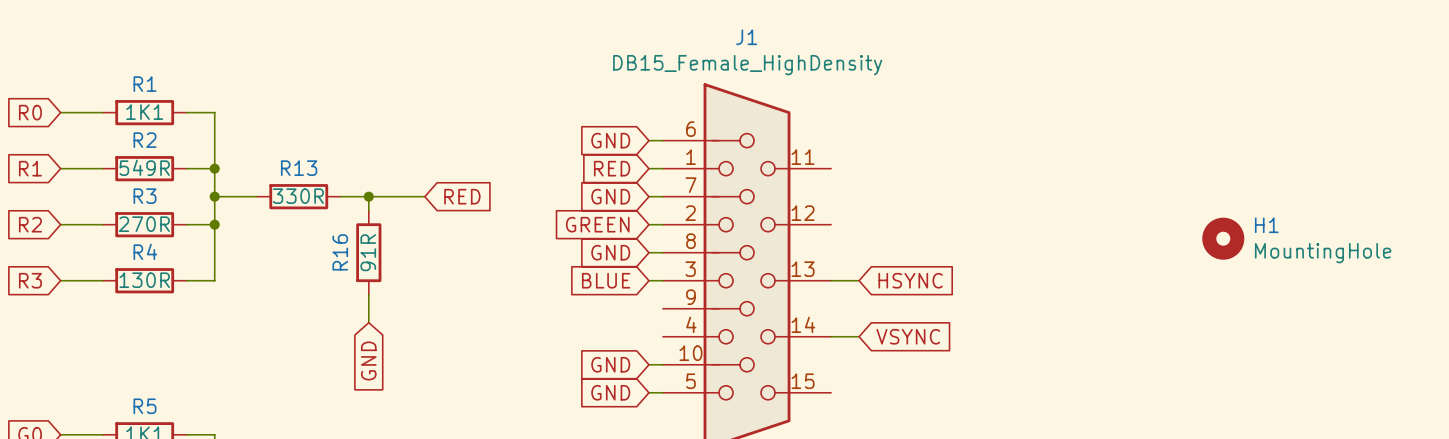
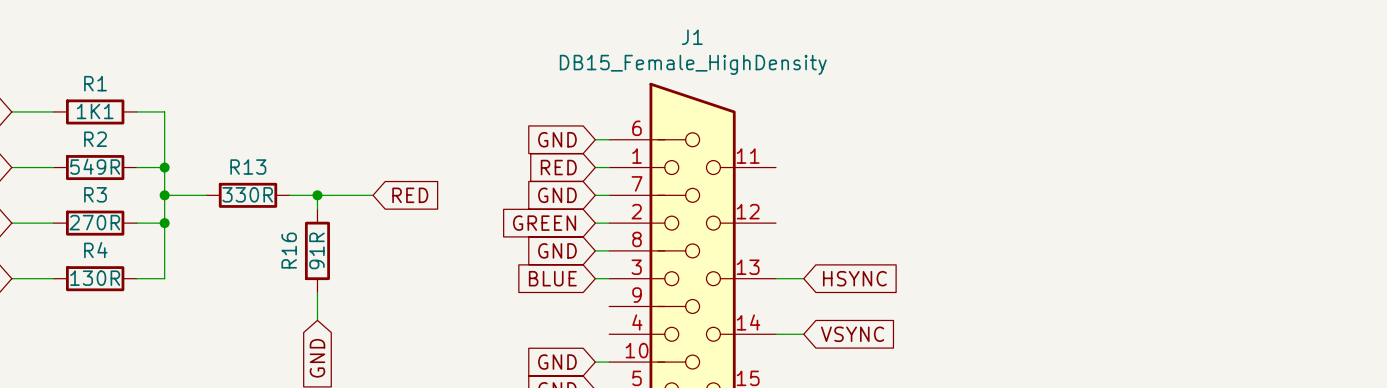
H1: MountingHole (1223, 238) -> none

